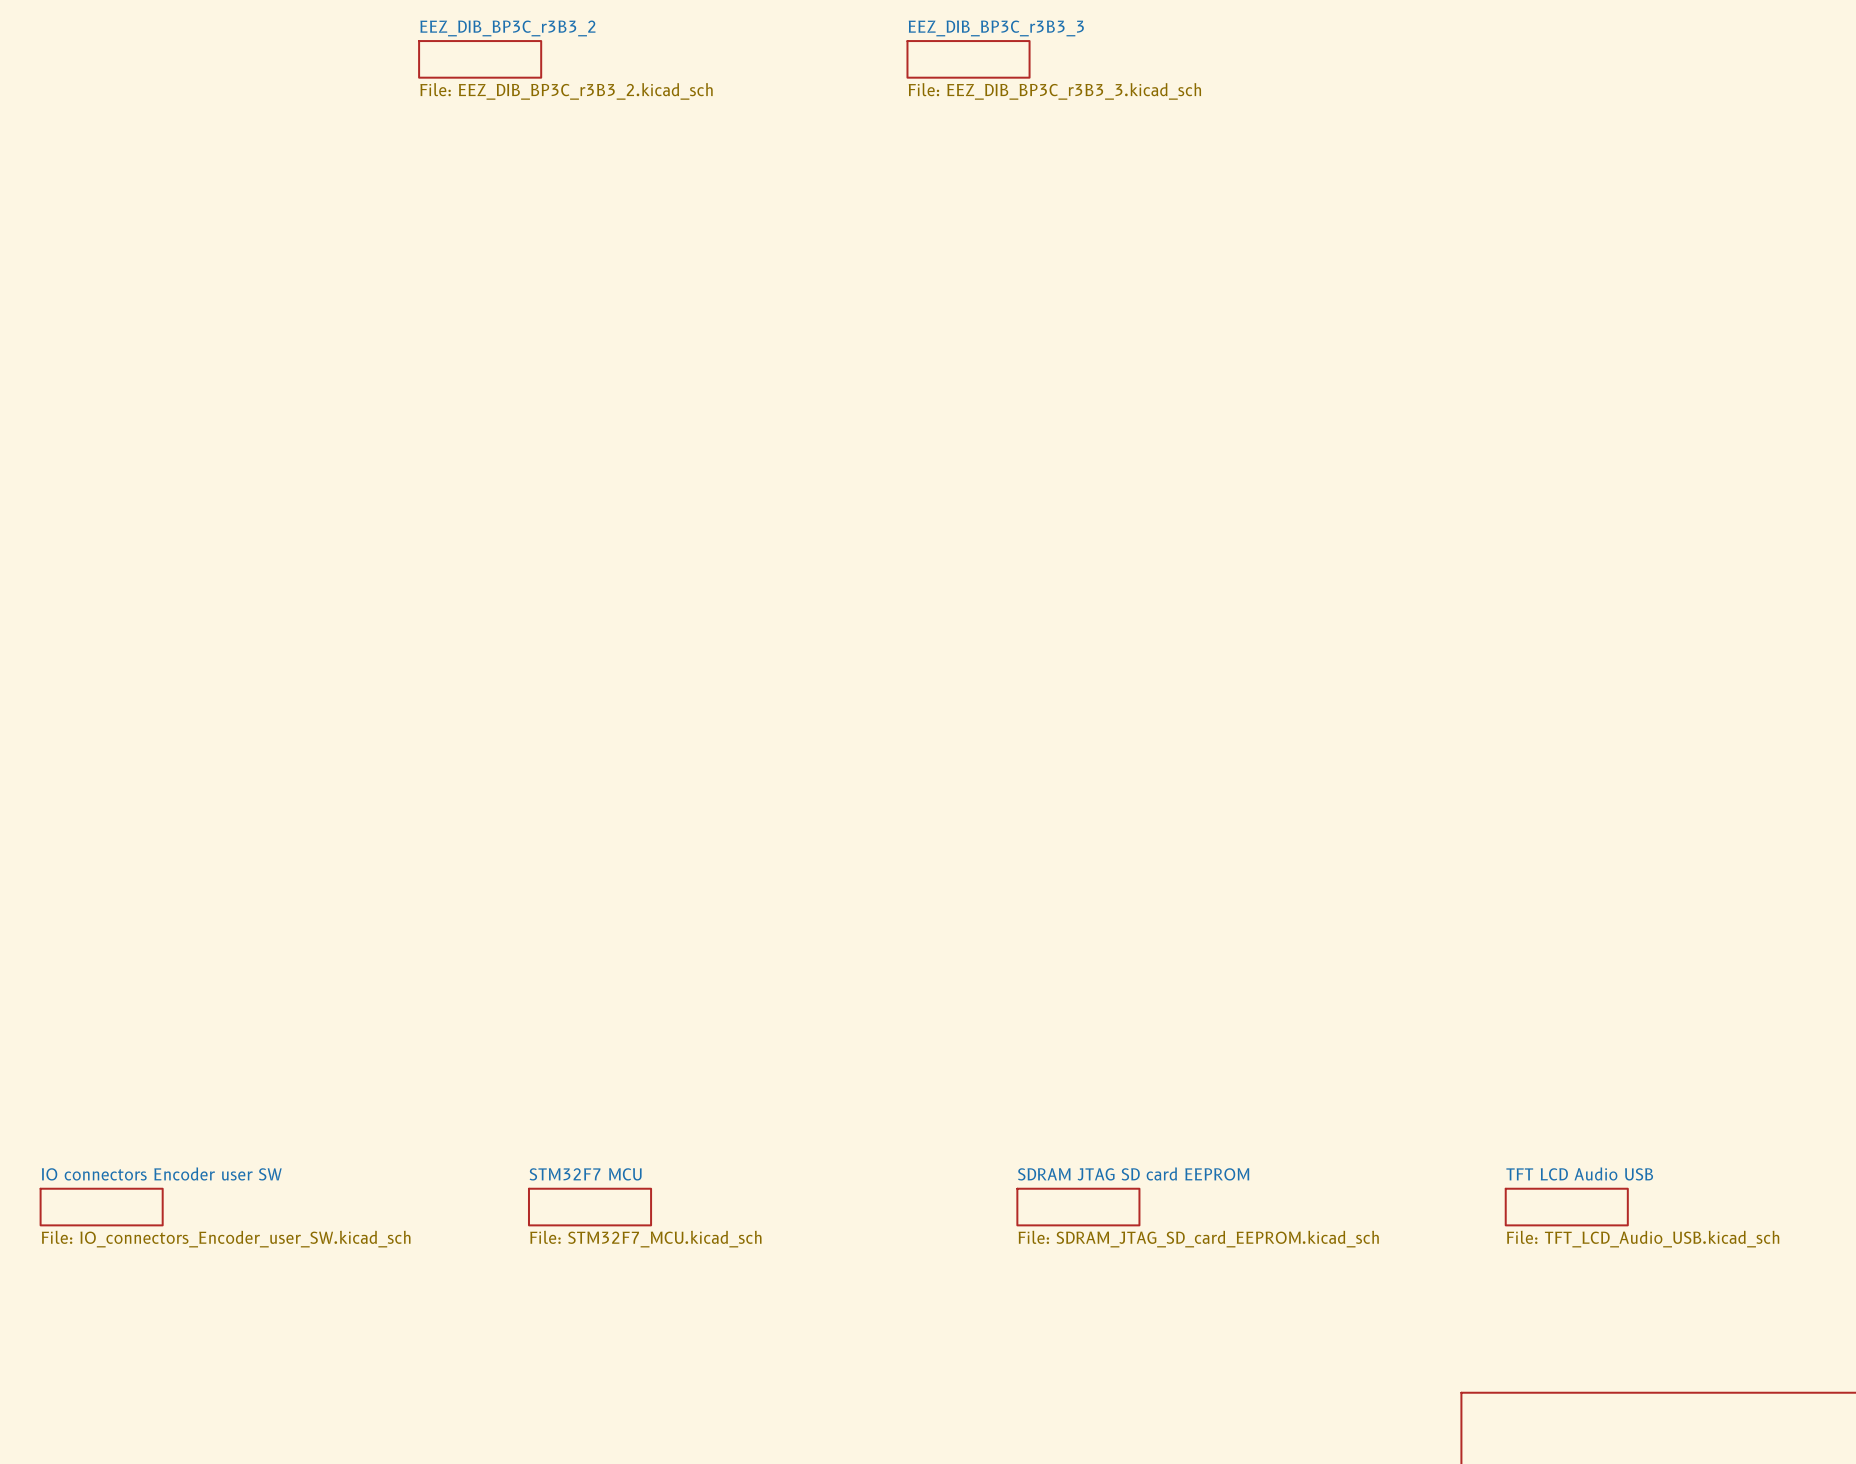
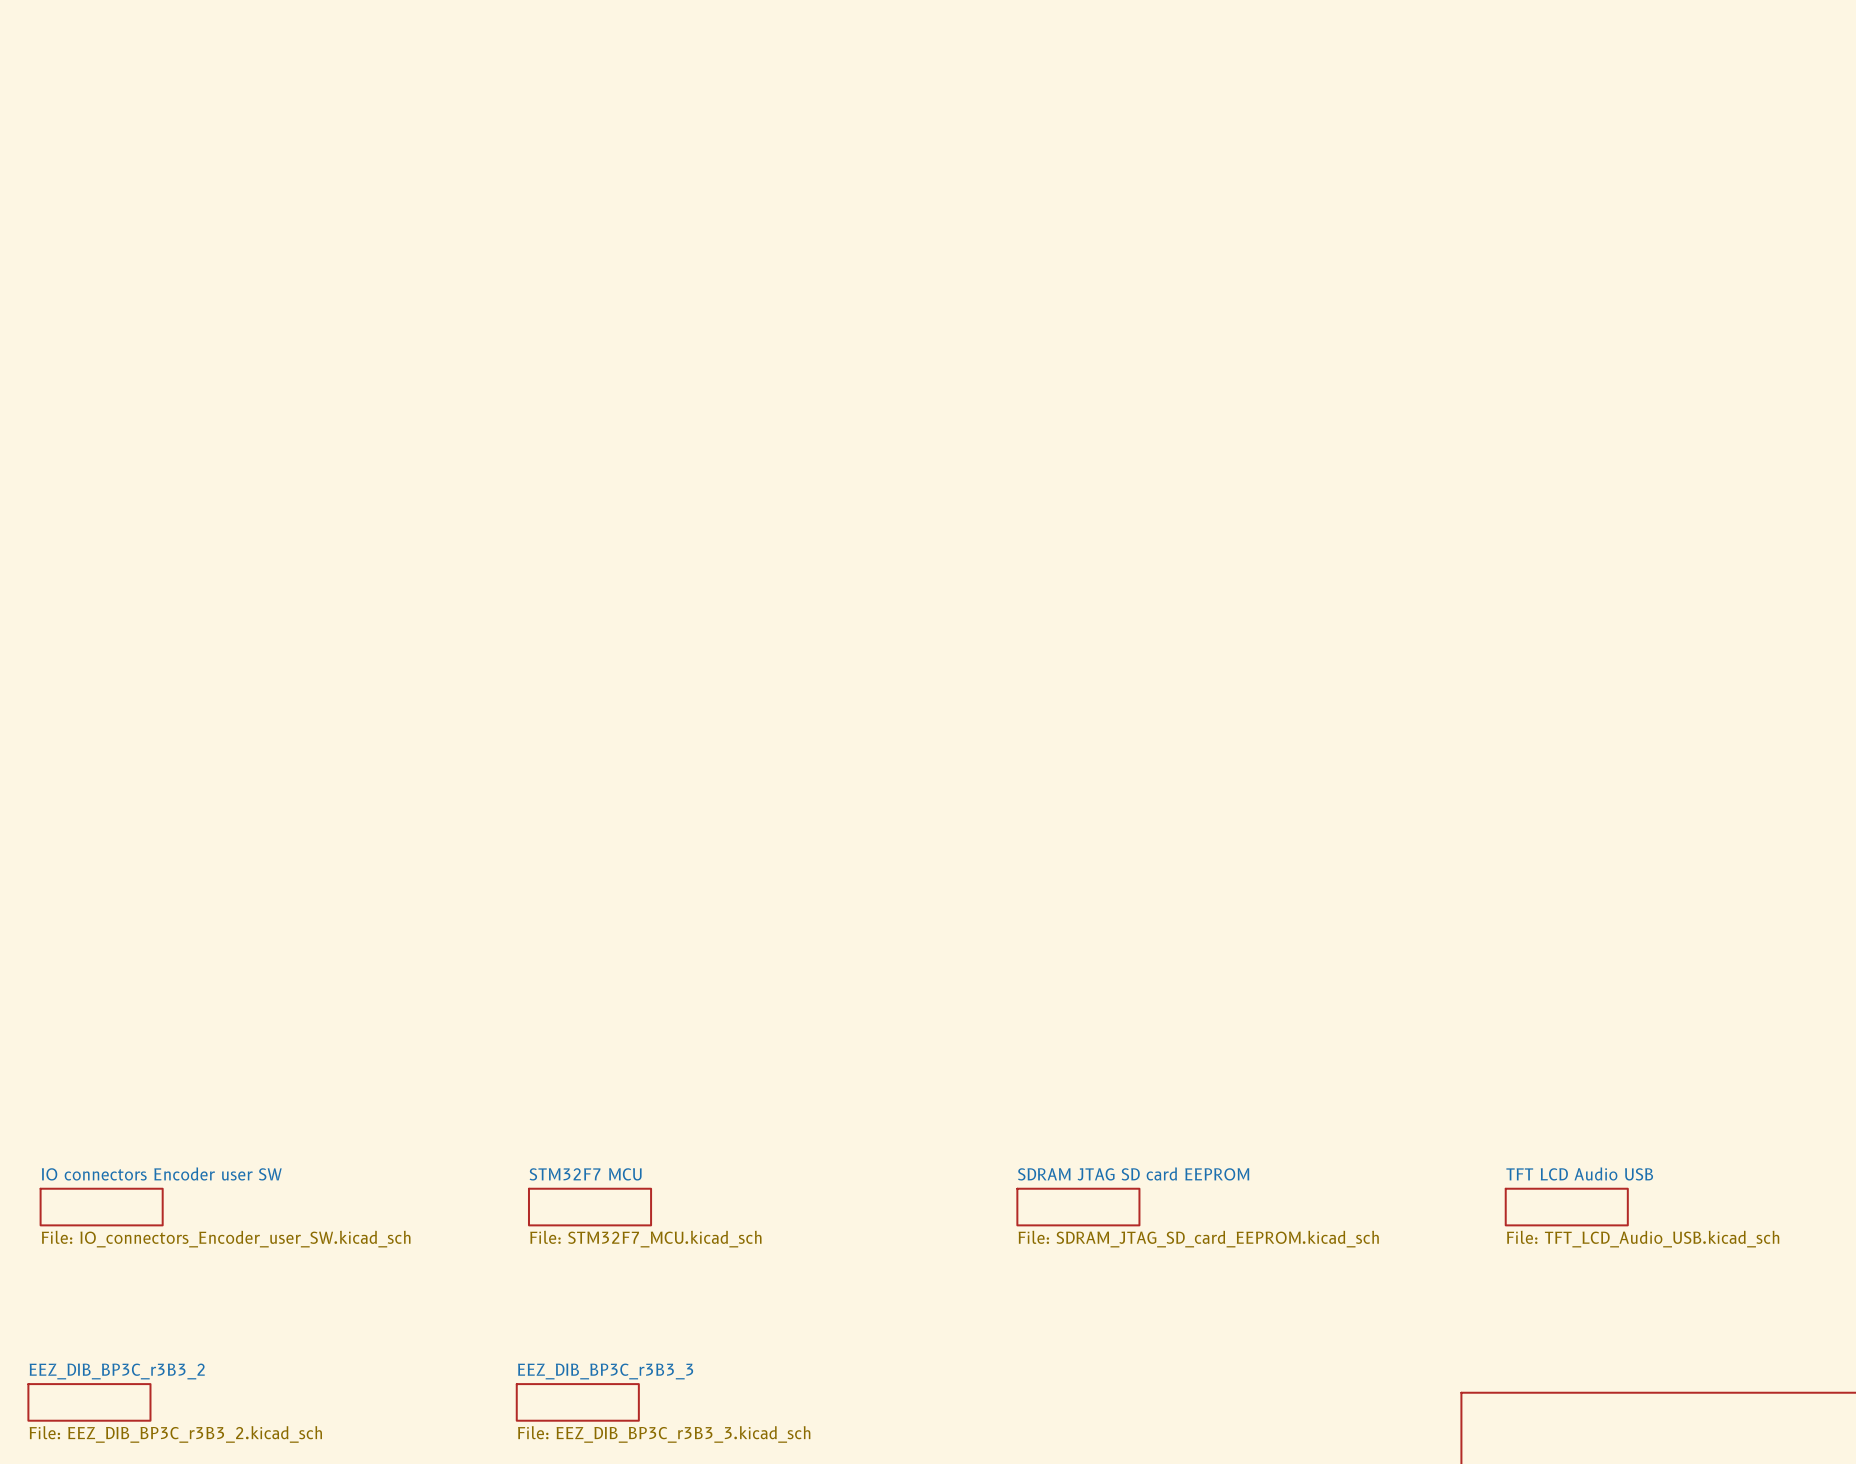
sheet EEZ_DIB_BP3C_r3B3_2 position: (480, 59) -> (89, 1402)
sheet EEZ_DIB_BP3C_r3B3_3 position: (968, 59) -> (577, 1402)

